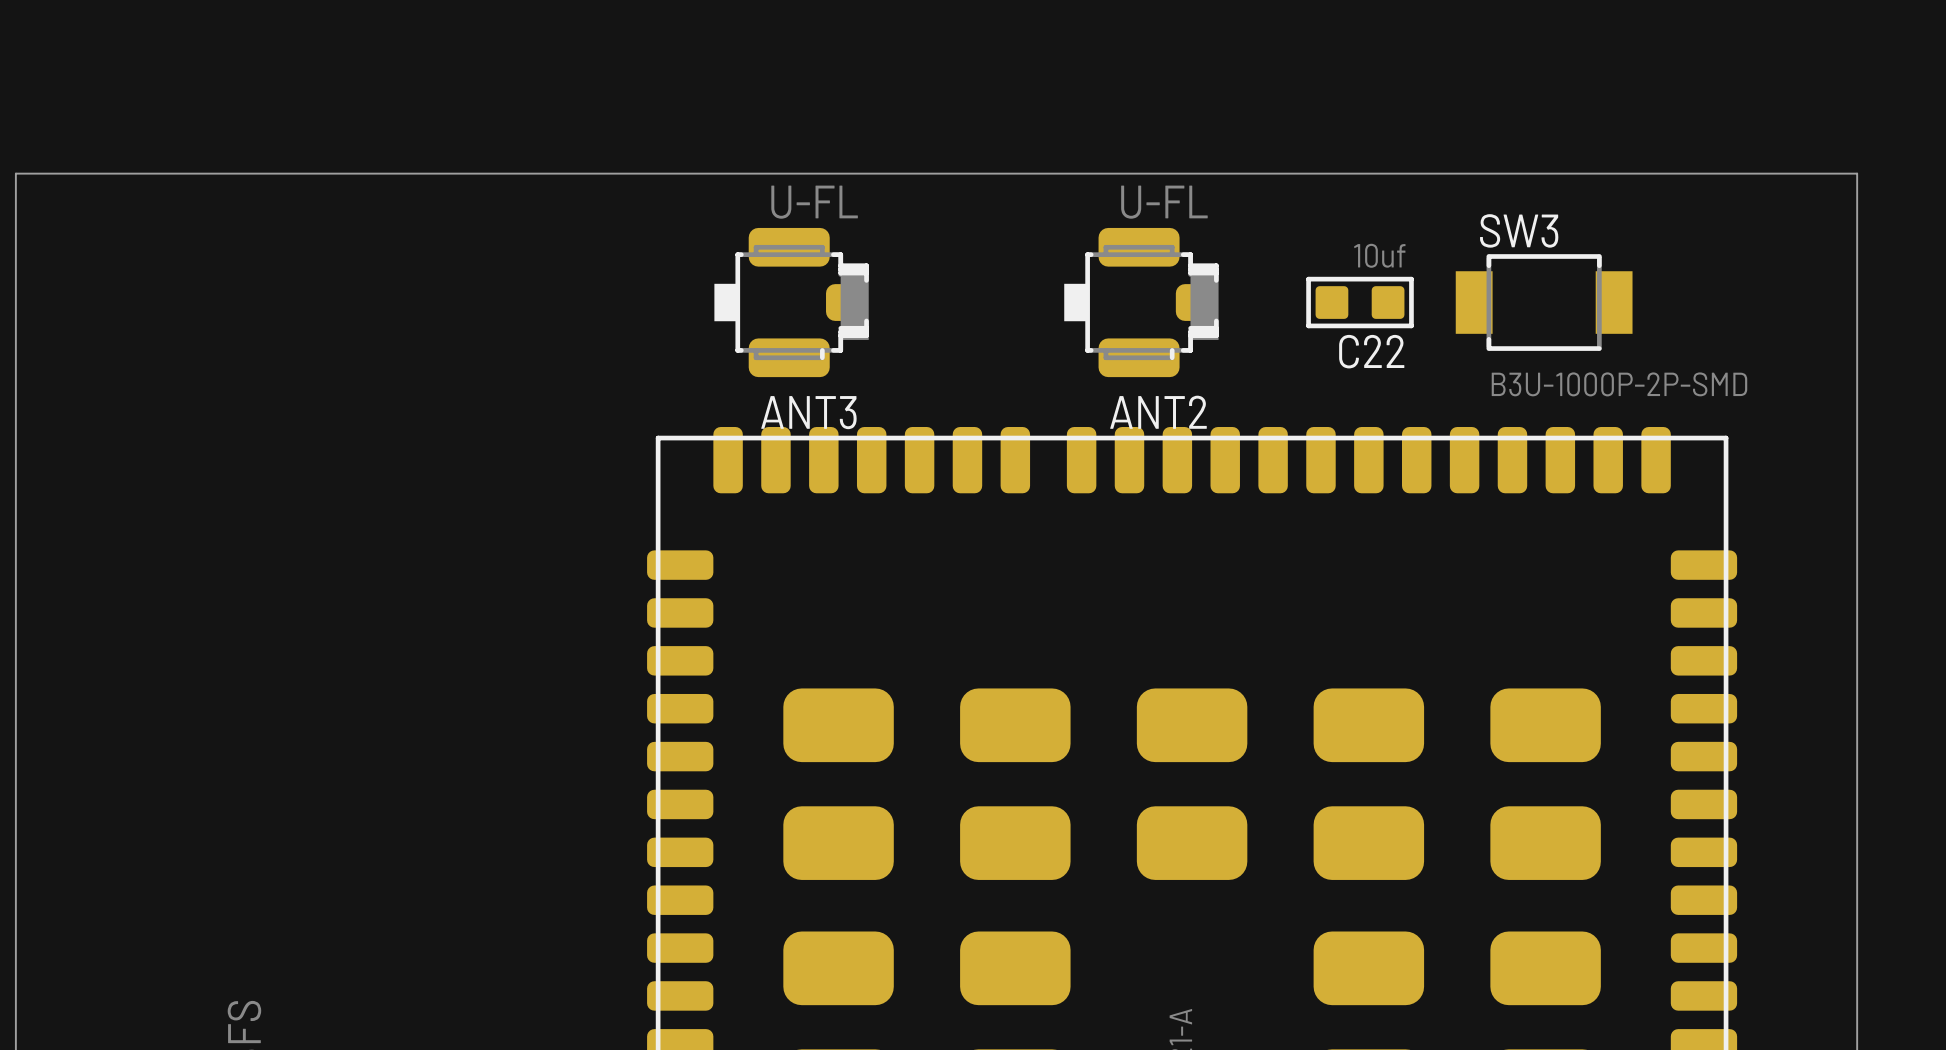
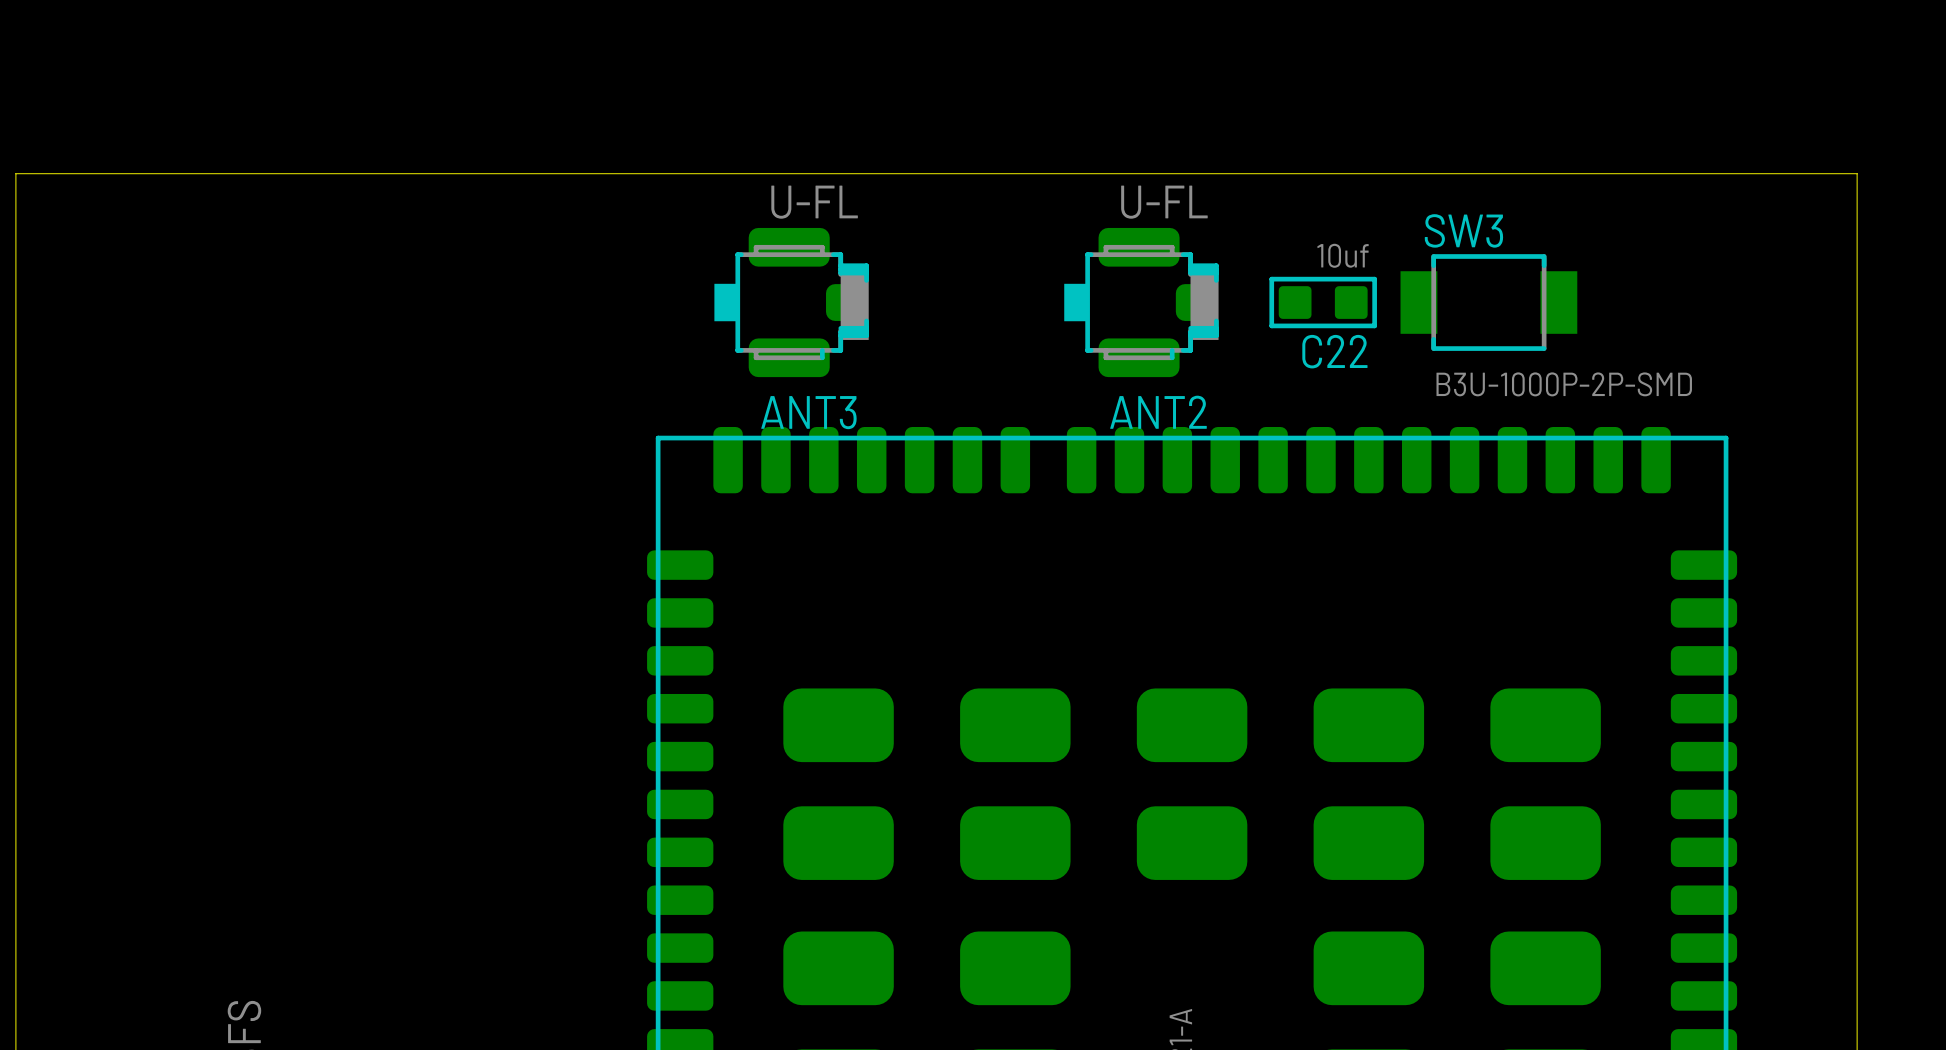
C22 position: (1360, 302) -> (1323, 302)
SW3 position: (1544, 302) -> (1488, 302)

